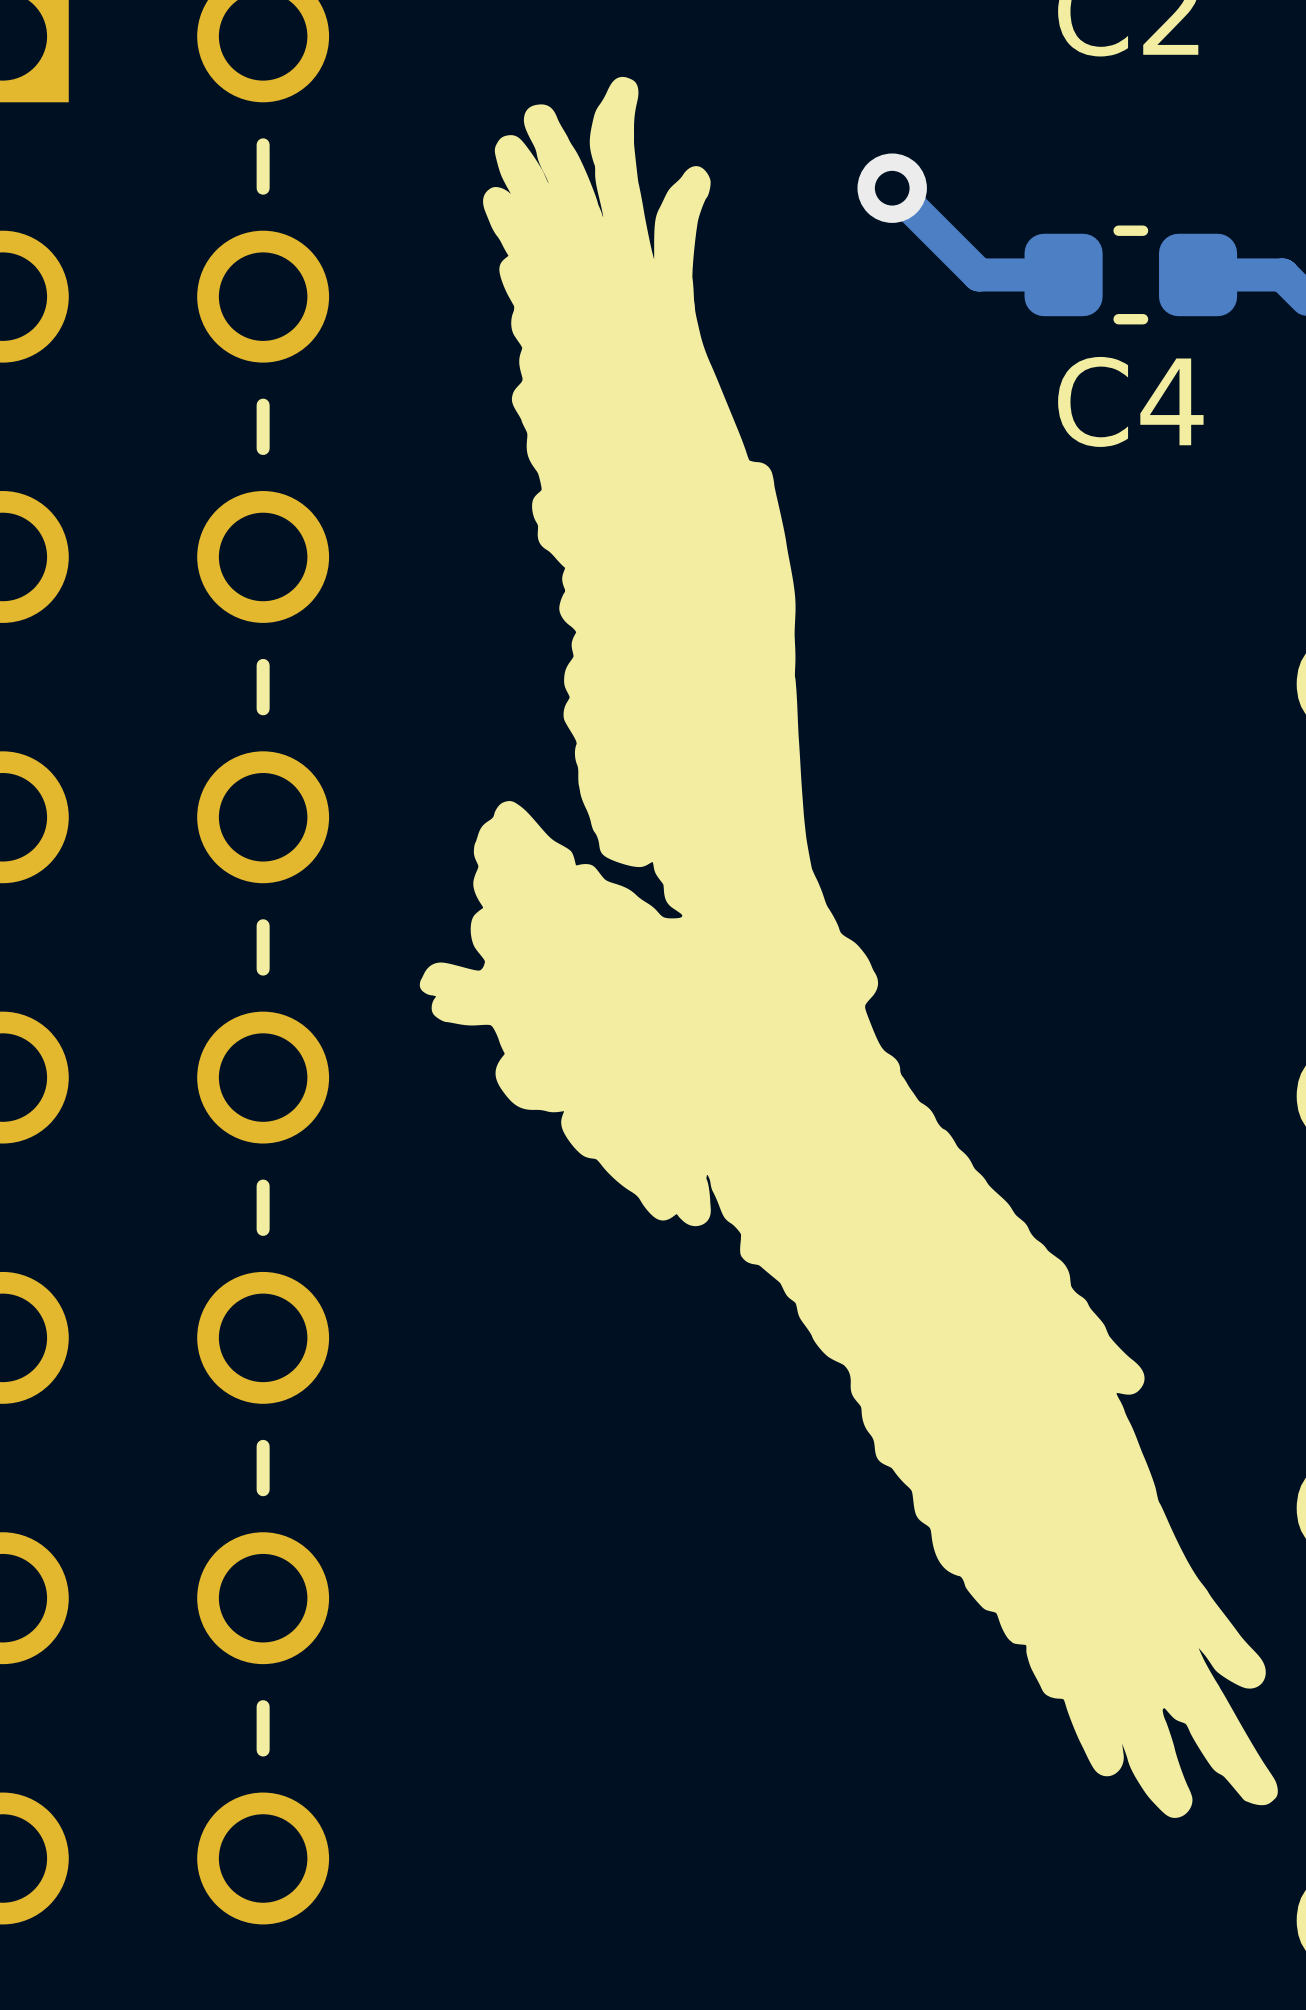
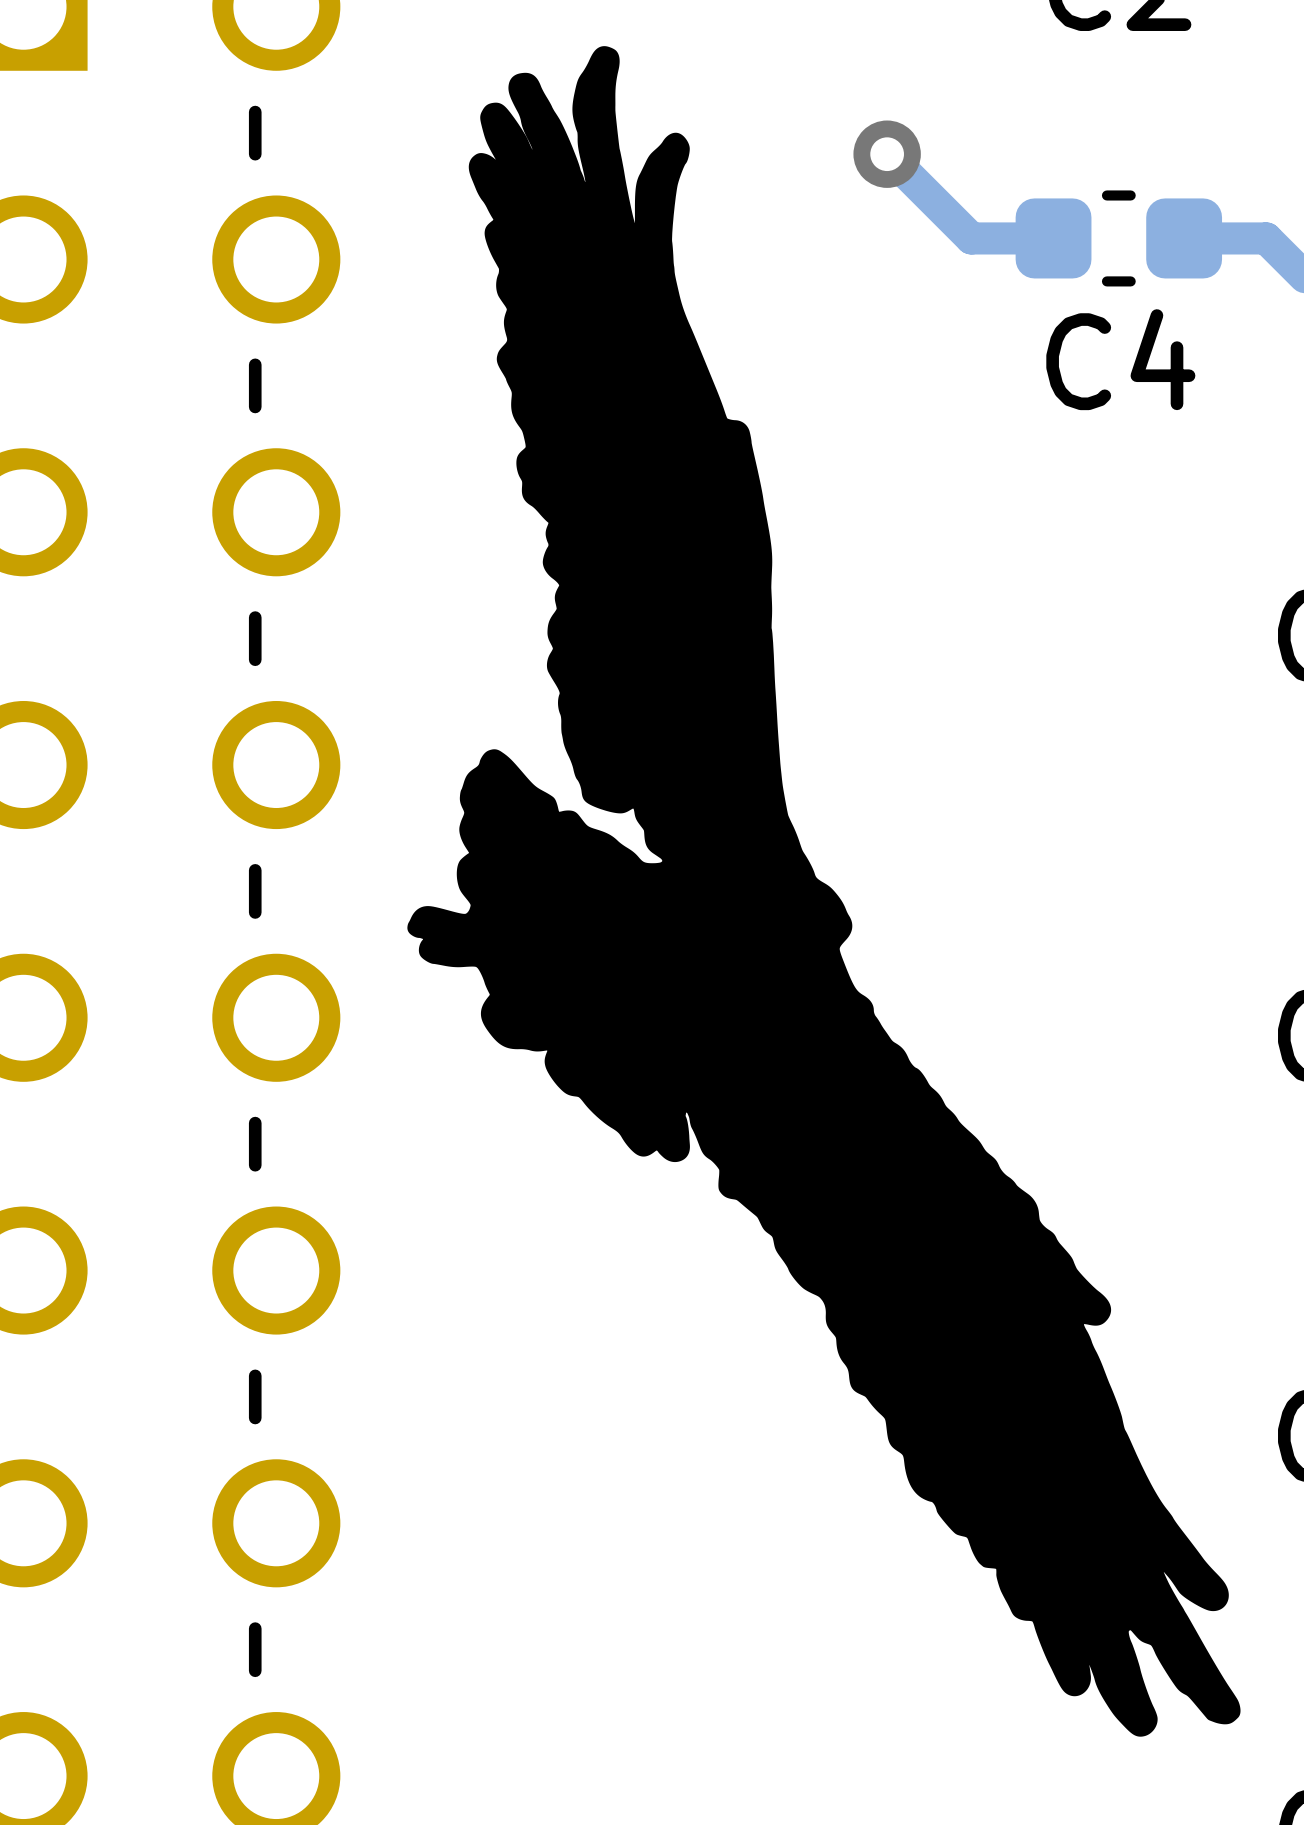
line: (263, 144) (263, 188) -> (255, 112) (255, 154)
line: (263, 405) (263, 448) -> (255, 364) (255, 406)
line: (263, 665) (263, 708) -> (255, 617) (255, 659)
line: (263, 925) (263, 969) -> (255, 870) (255, 912)
drawing position: (848, 947) -> (823, 891)
line: (263, 1186) (263, 1229) -> (255, 1123) (255, 1165)
line: (263, 1446) (263, 1489) -> (255, 1375) (255, 1417)
line: (263, 1706) (263, 1750) -> (255, 1628) (255, 1670)

